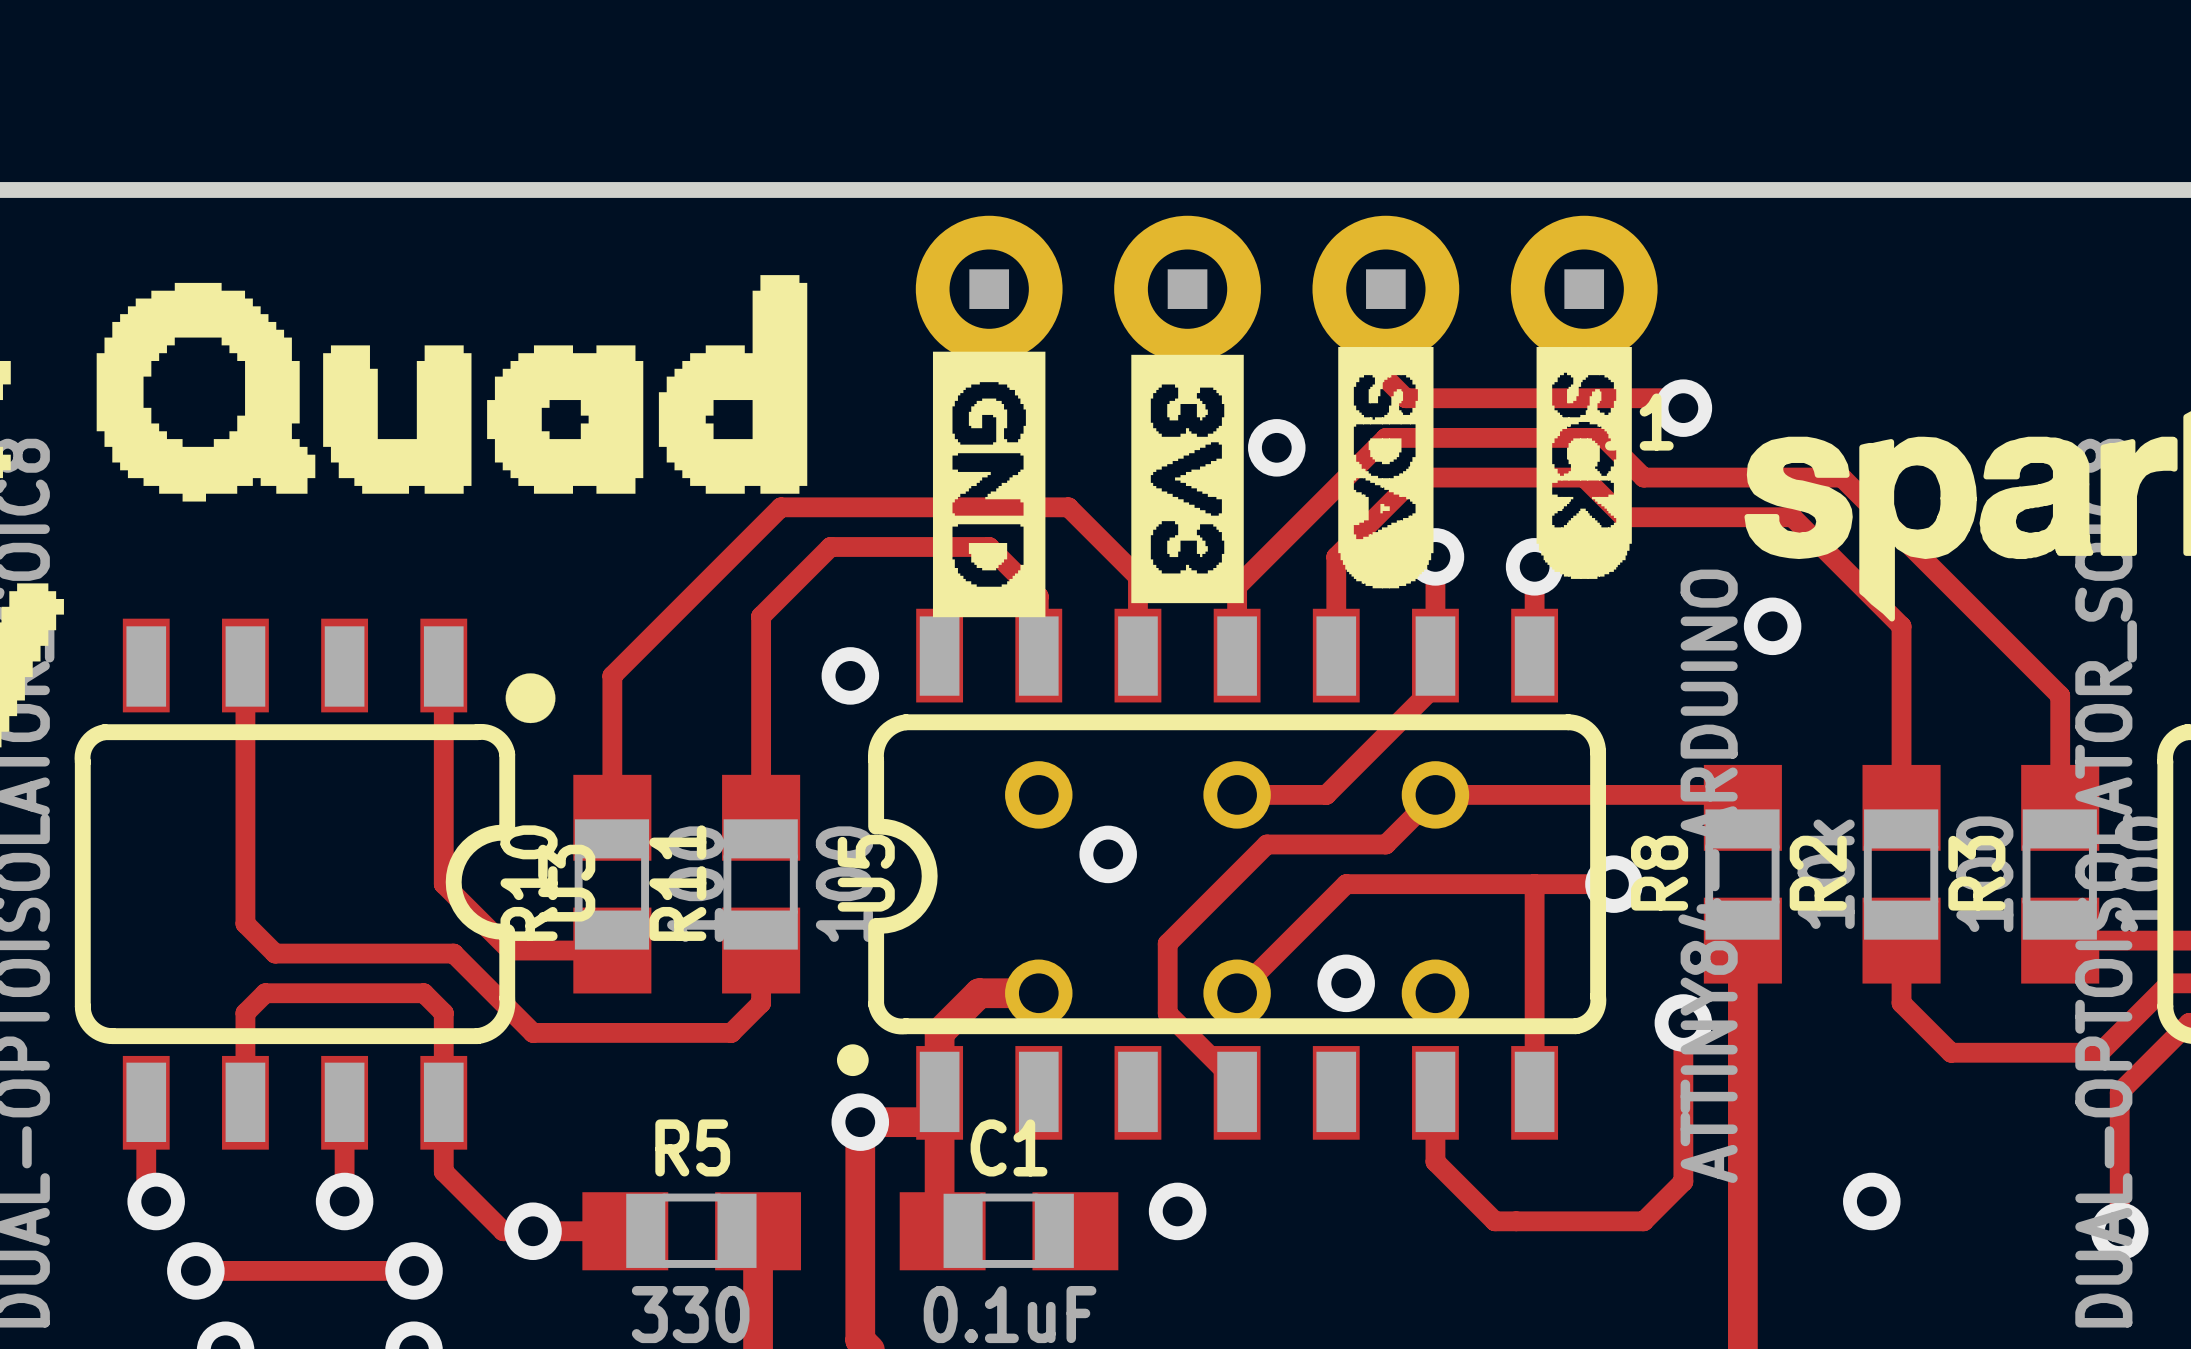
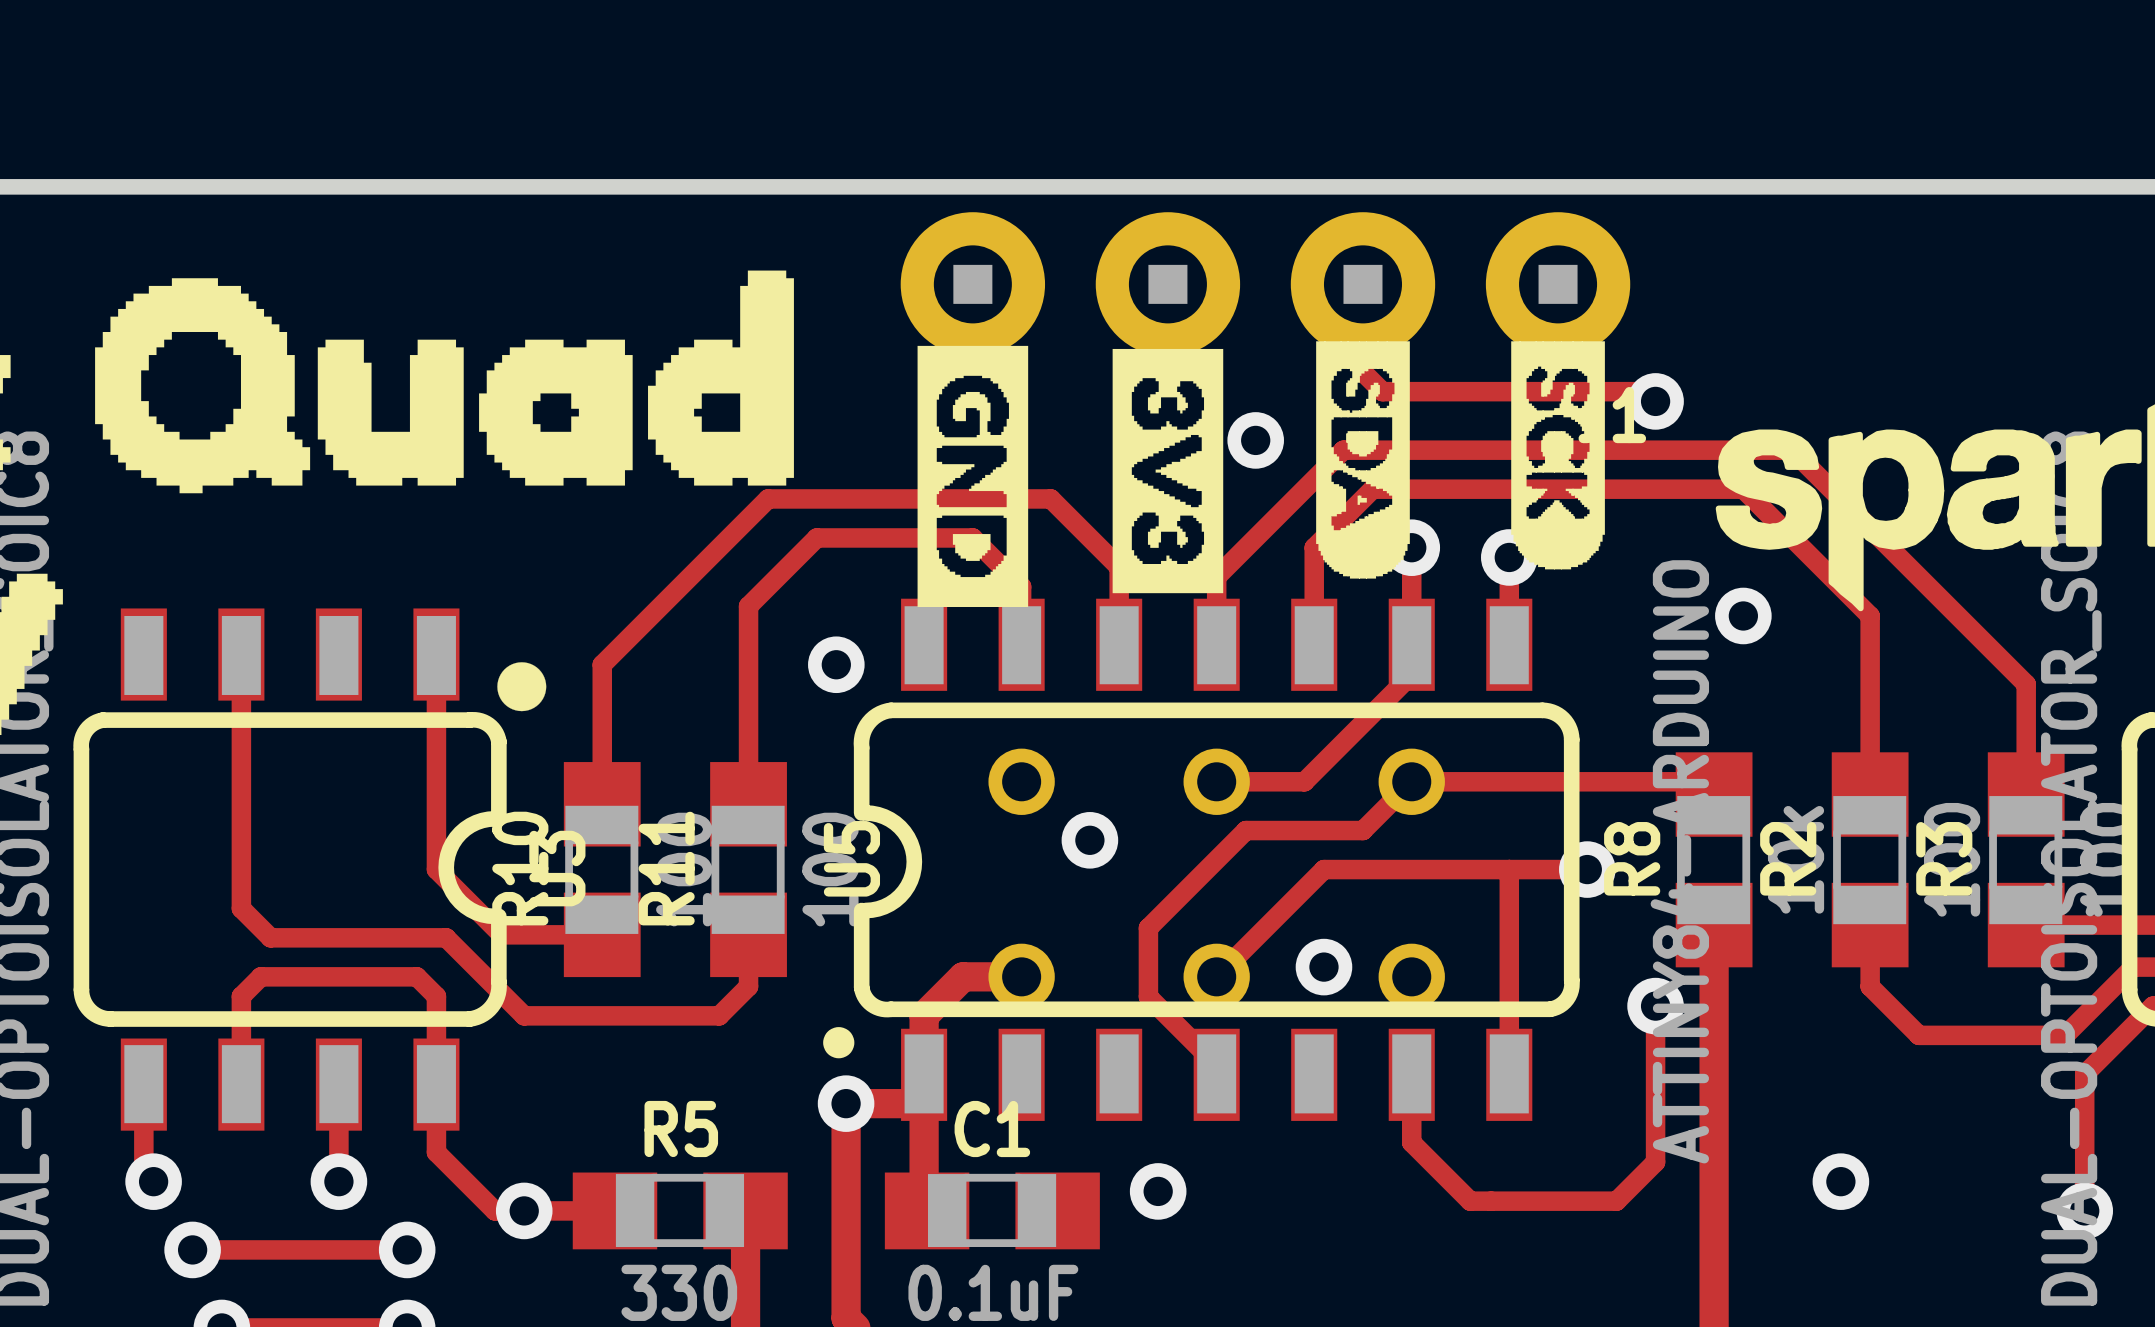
track: (1366, 457) (1385, 437) (1604, 437) (1643, 477) (1842, 477) -> (1343, 450) (1792, 450) (1811, 469)
track: (1395, 497) (1415, 477) (1584, 477) (1623, 517) (1792, 517) -> (1372, 489) (1743, 489) (1762, 508)

